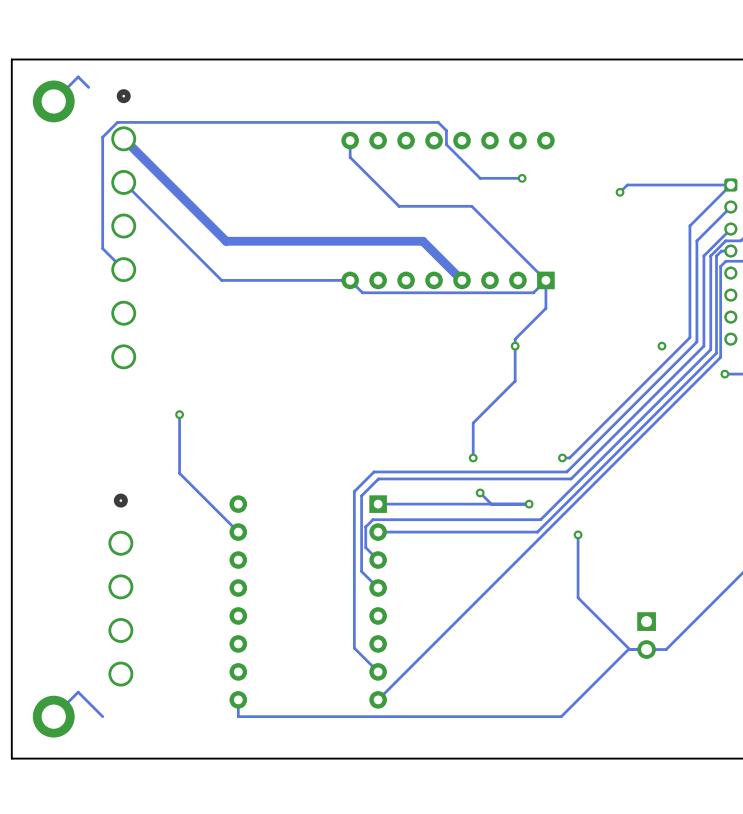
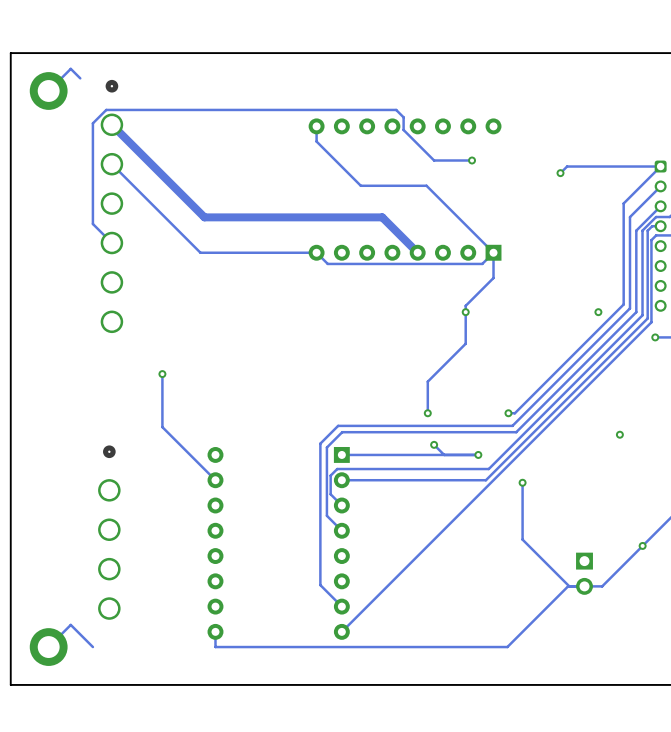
via: none -> (619, 434)
via: none -> (642, 545)

